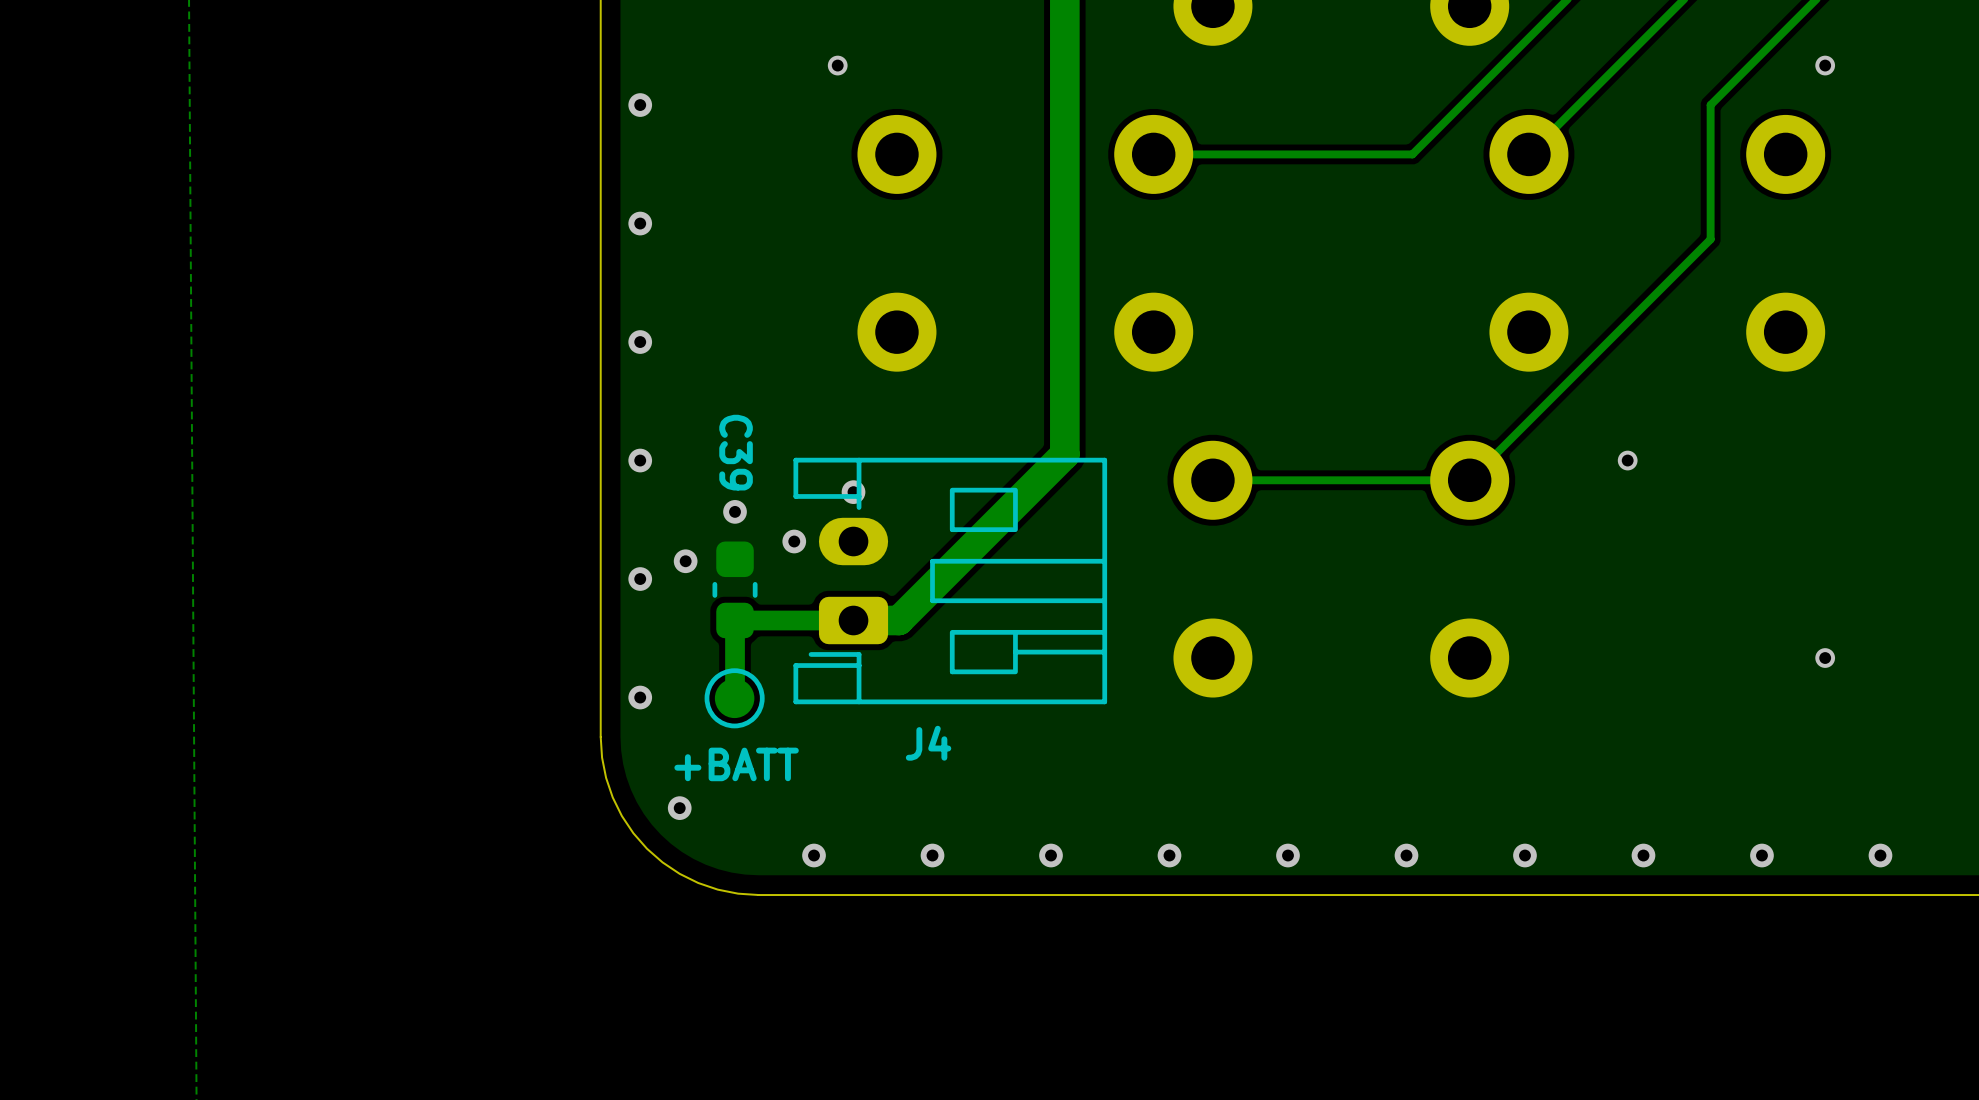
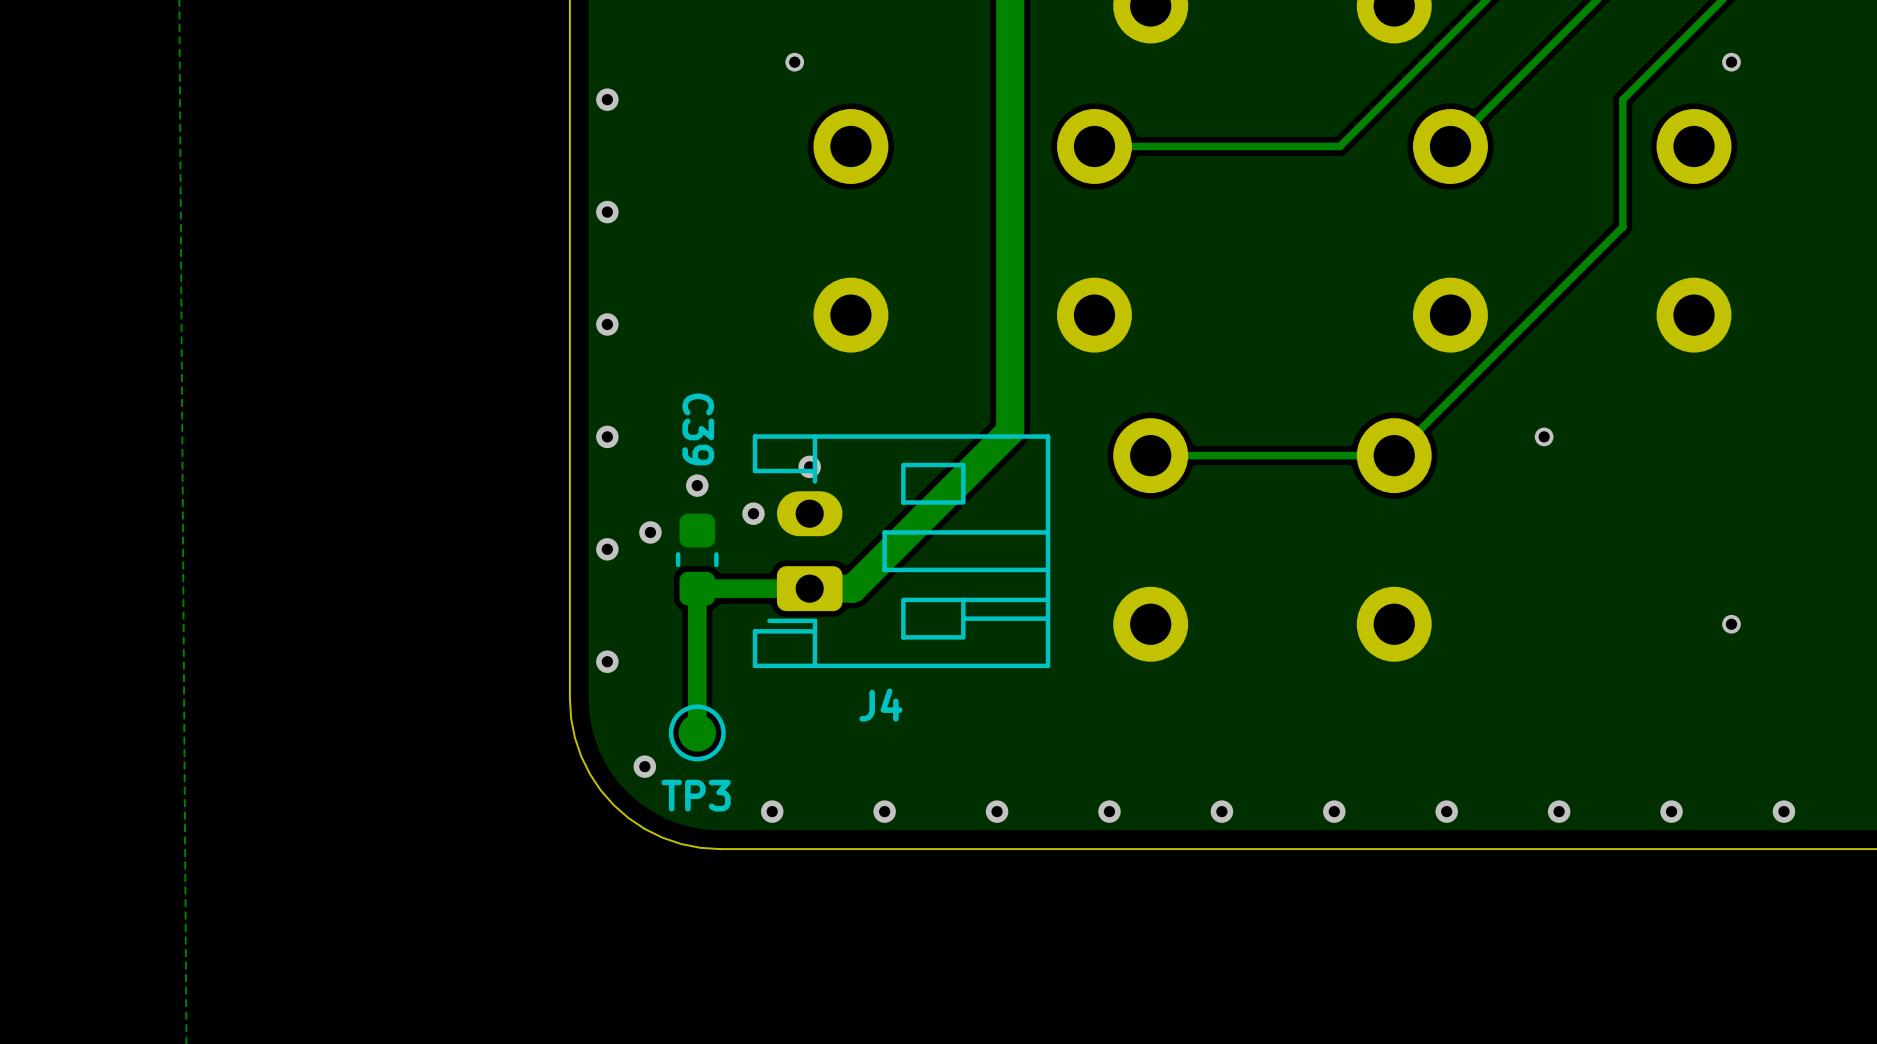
track: none -> (697, 662) (697, 732)
+BATT: (734, 698) -> none
TP3: none -> (697, 732)

